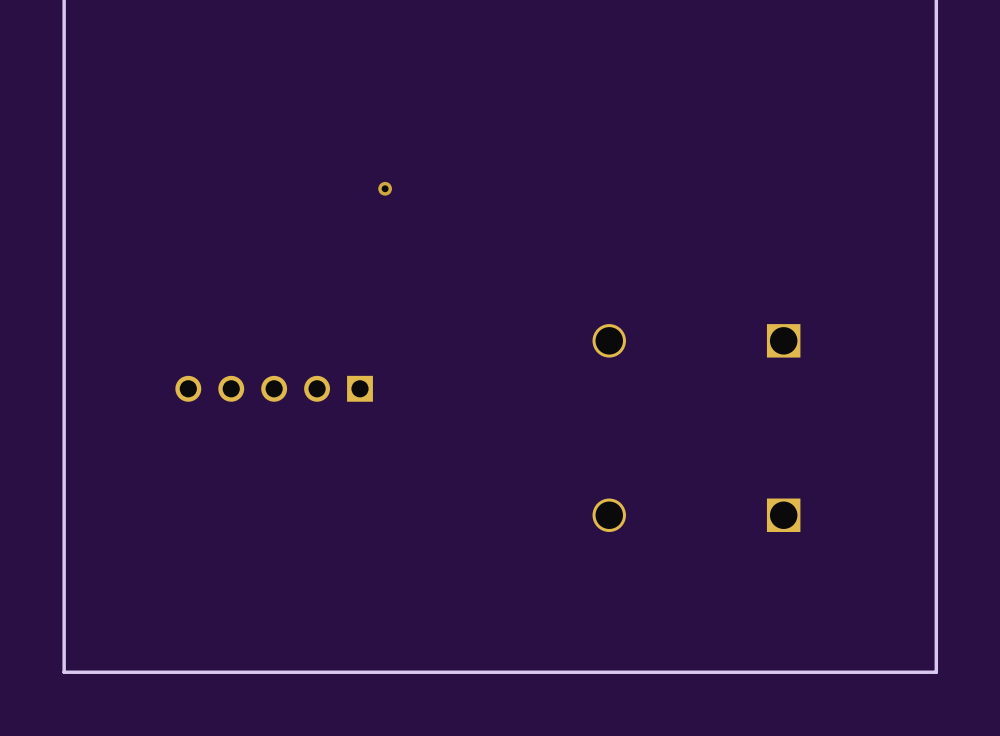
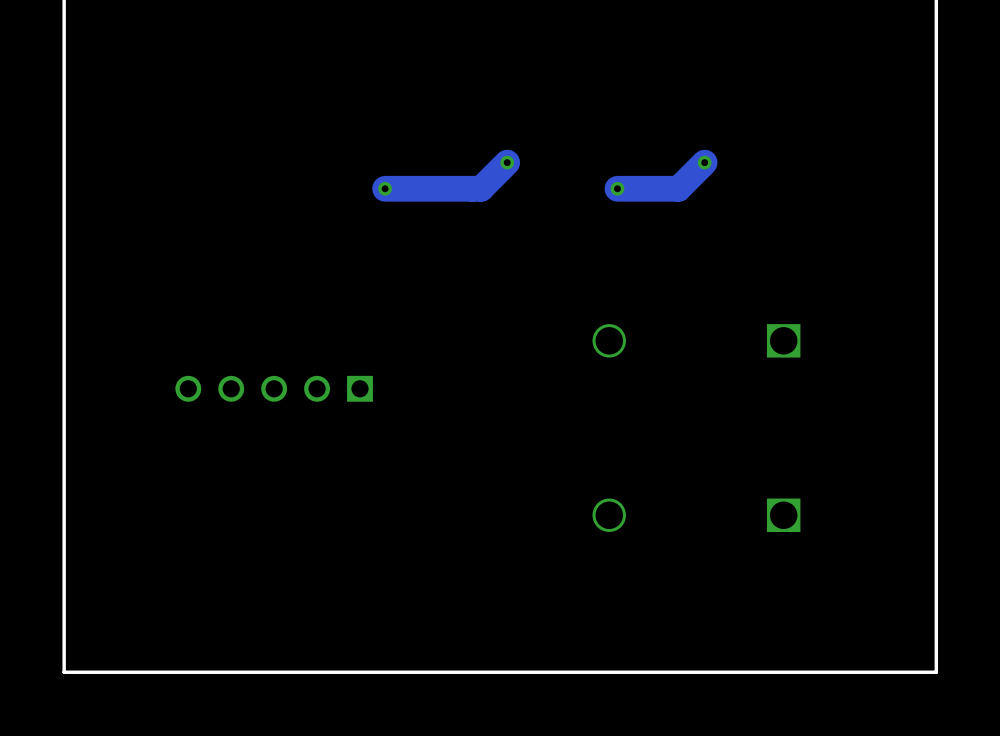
track: none -> (507, 162) (481, 188) (385, 188)
via: none -> (507, 162)
track: none -> (704, 162) (678, 188) (617, 188)
via: none -> (704, 162)
via: none -> (617, 188)

